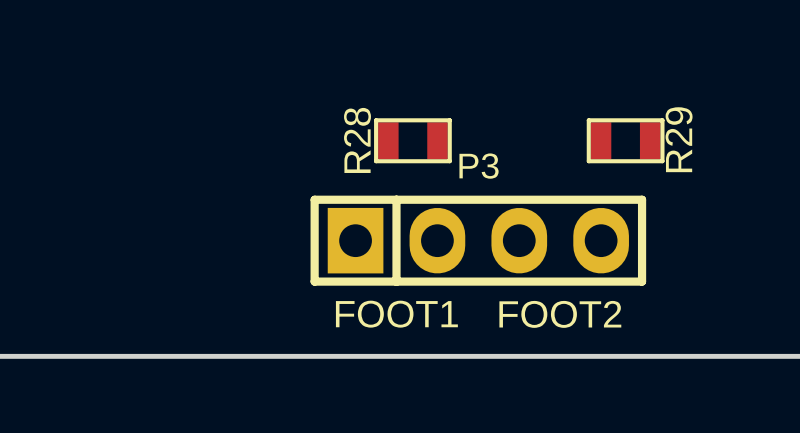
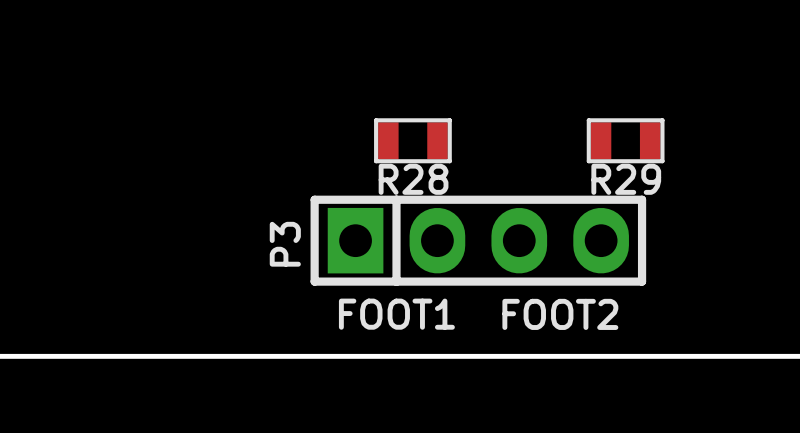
R29 name rotation: 0° (679, 139) -> 90° clockwise (626, 179)
R28 name rotation: 0° (357, 140) -> 90° clockwise (413, 179)
P3 name rotation: 0° (479, 166) -> 90° counterclockwise (285, 244)
P3 name position: P3 (479, 166) -> P3 (285, 244)

